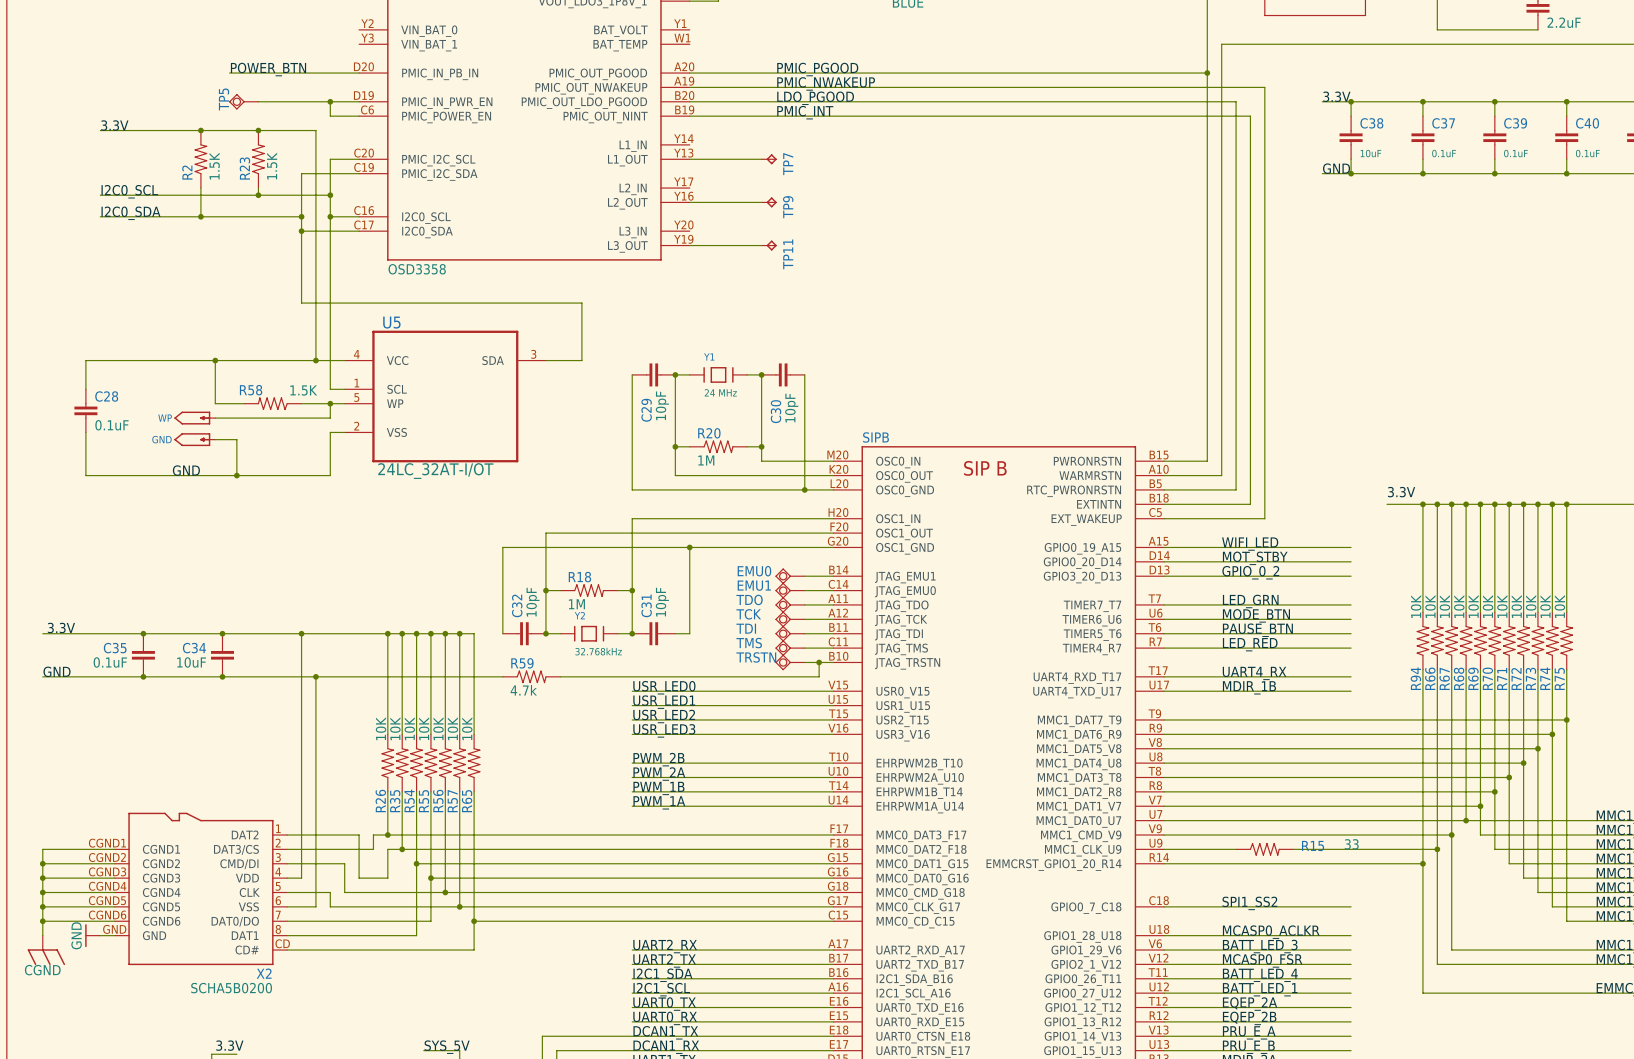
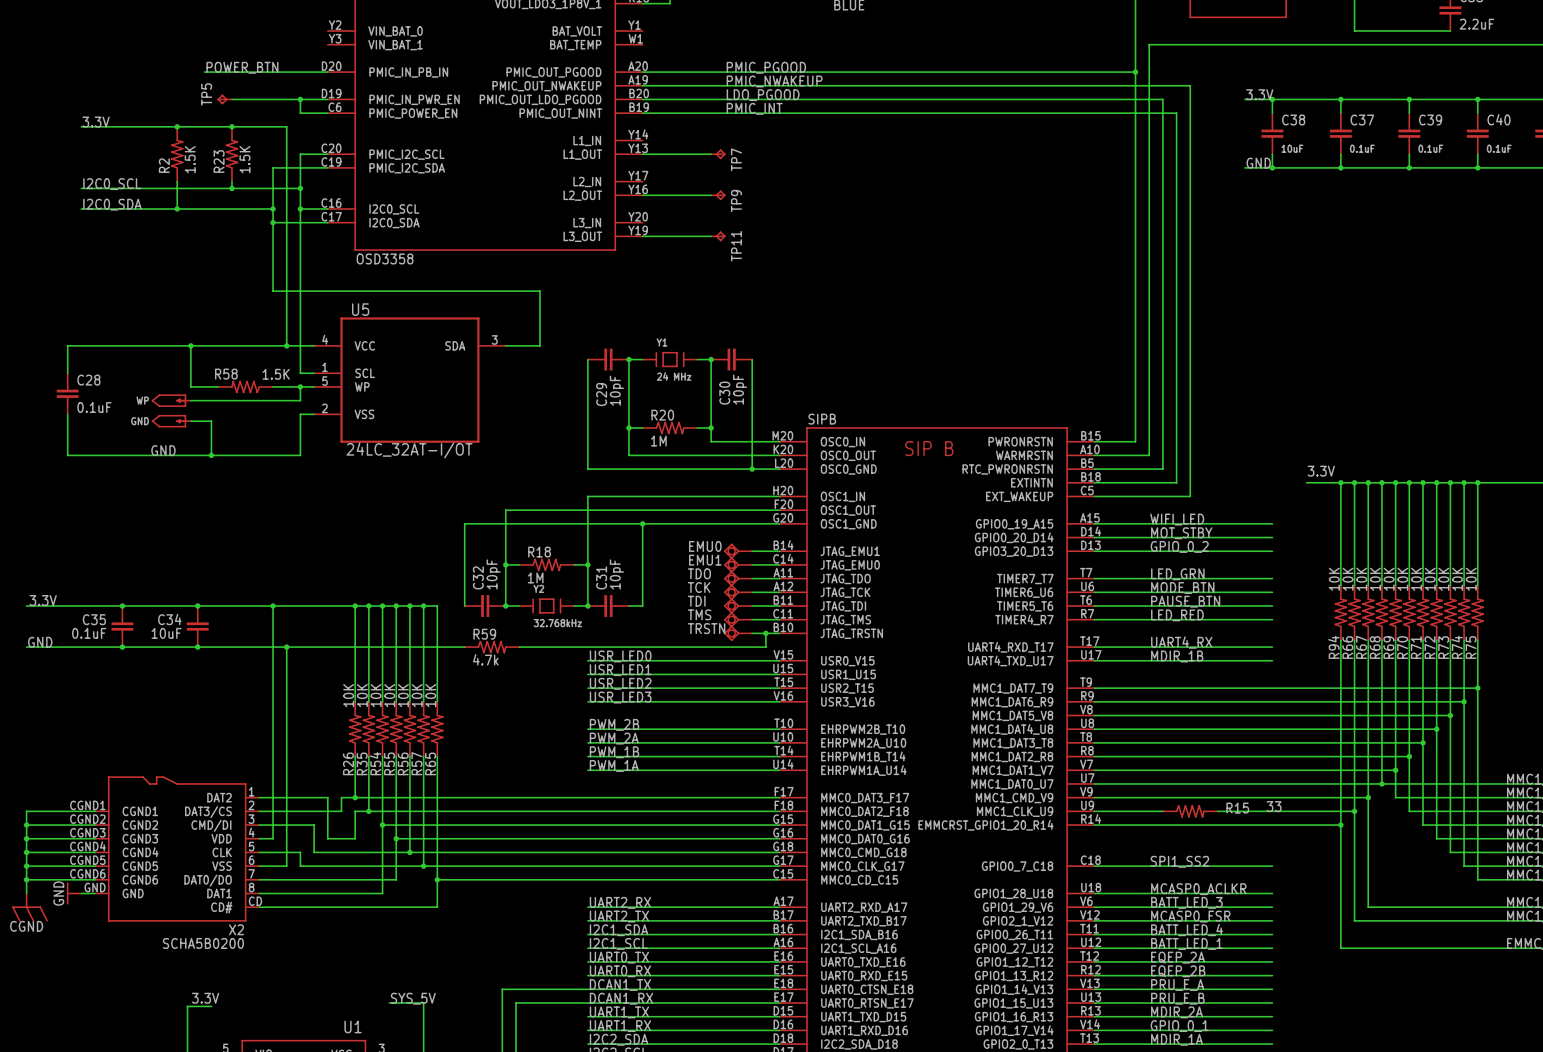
TP5 symbol: [229, 94, 259, 110] -> [217, 94, 232, 105]

